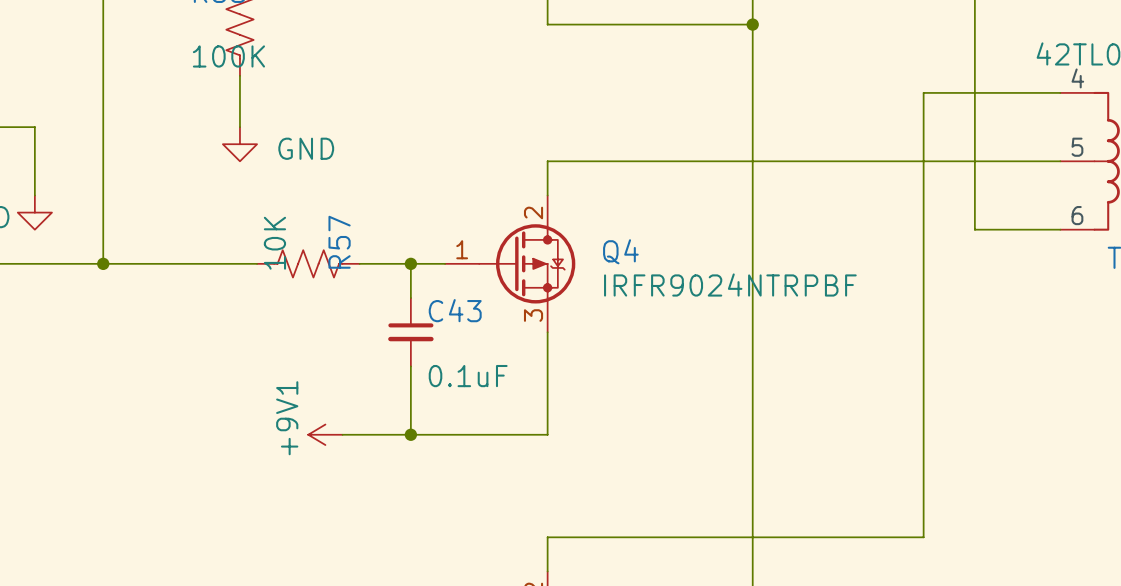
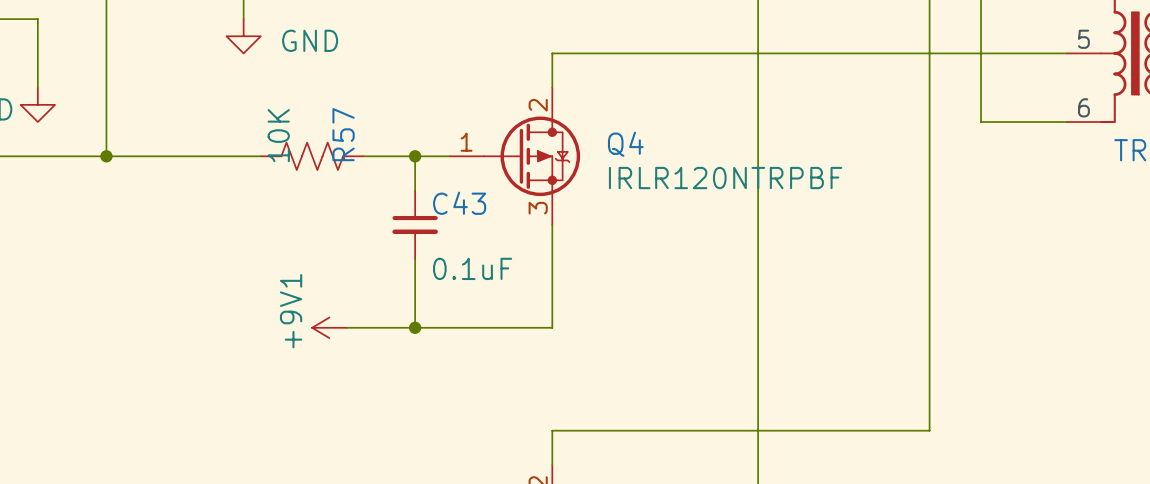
Q4 value: IRFR9024NTRPBF (730, 285) -> IRLR120NTRPBF (725, 178)

